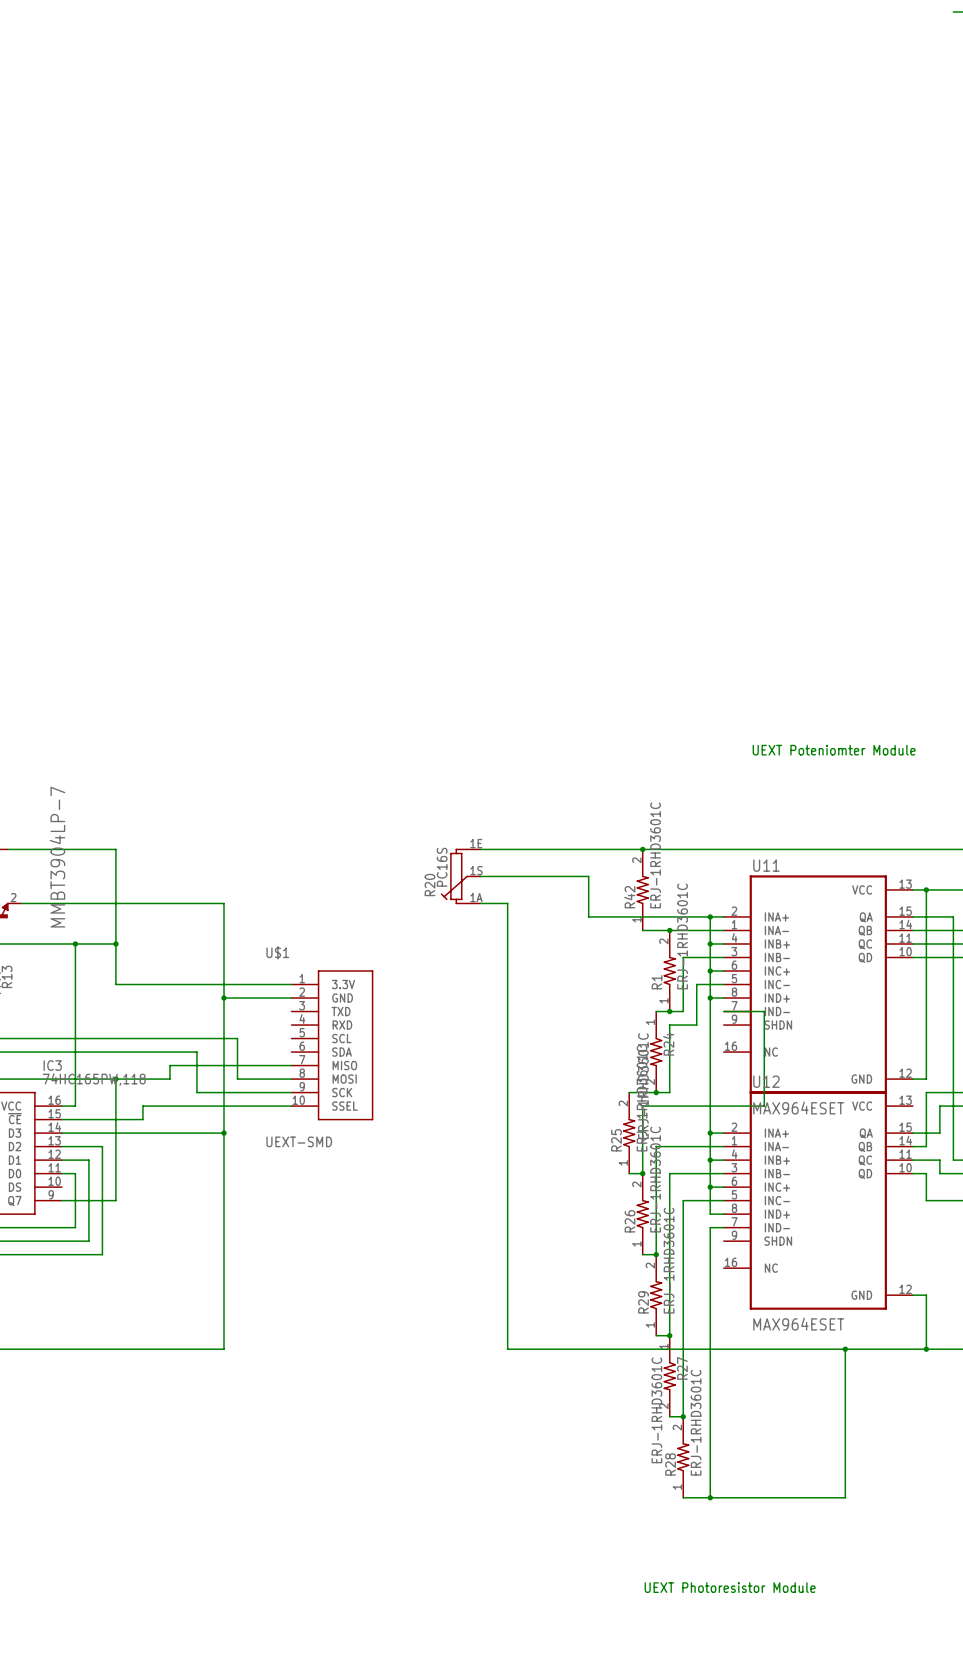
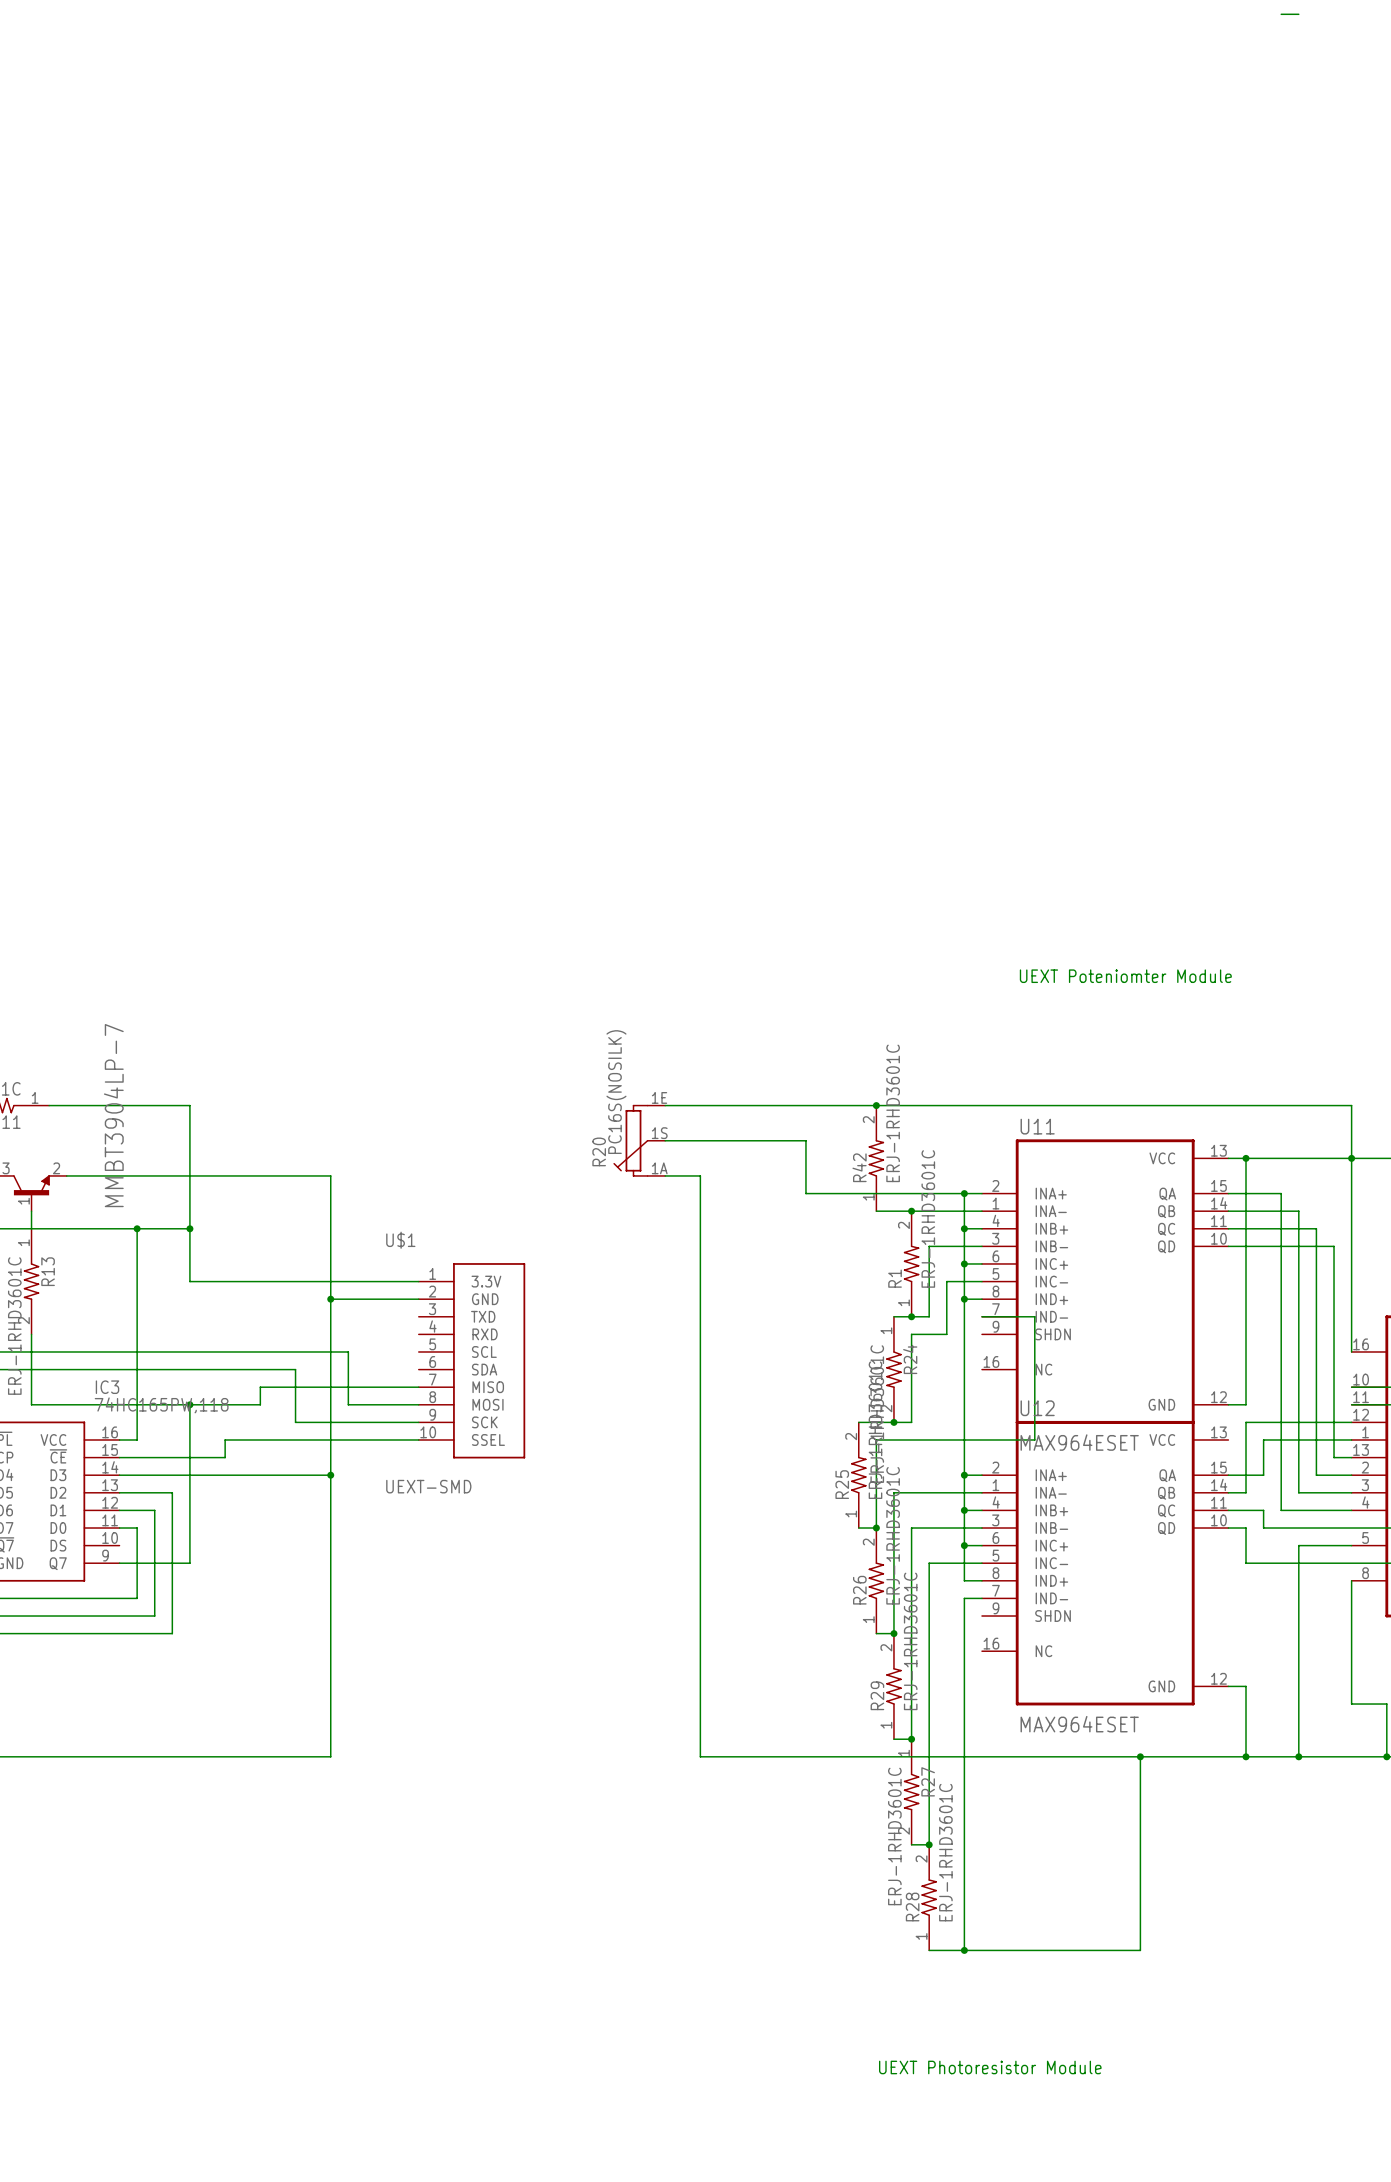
R20 value: PC16S (442, 867) -> PC16S(NOSILK) (616, 1092)

